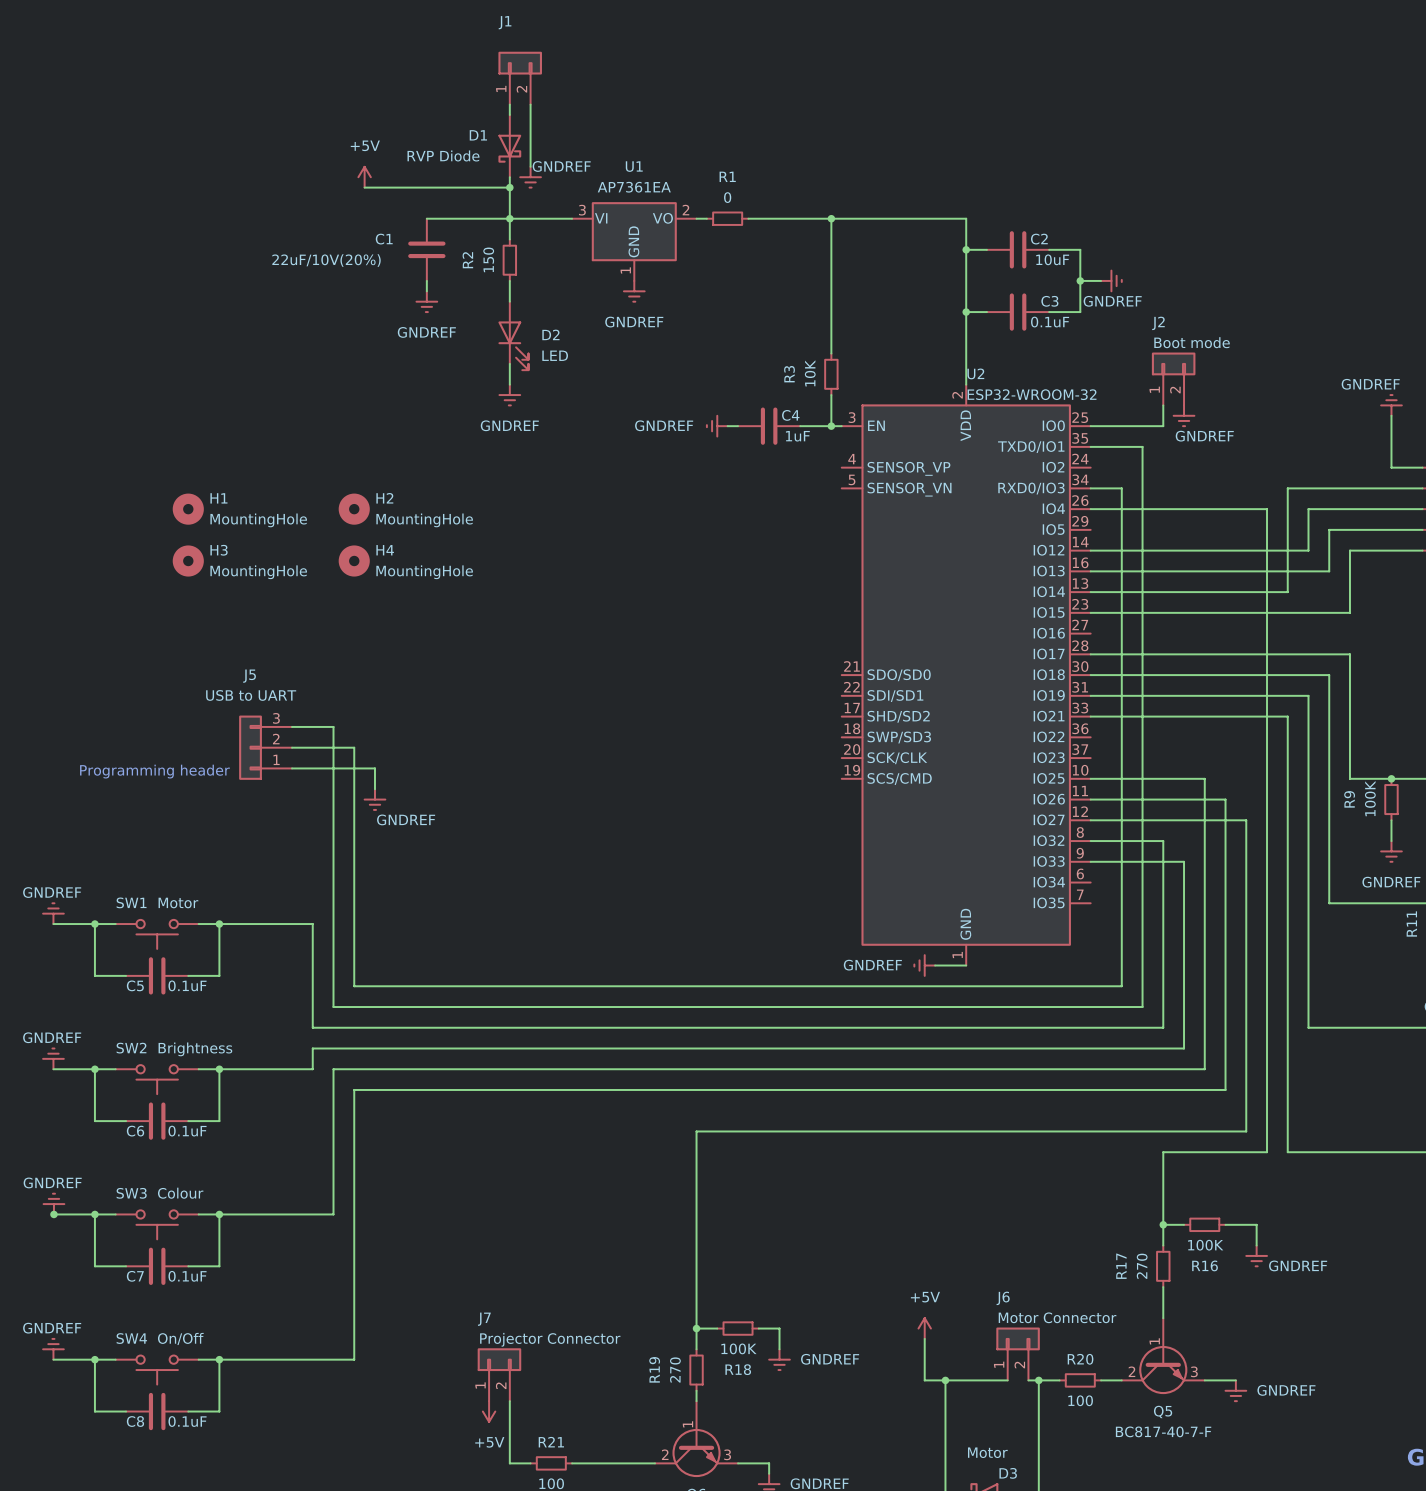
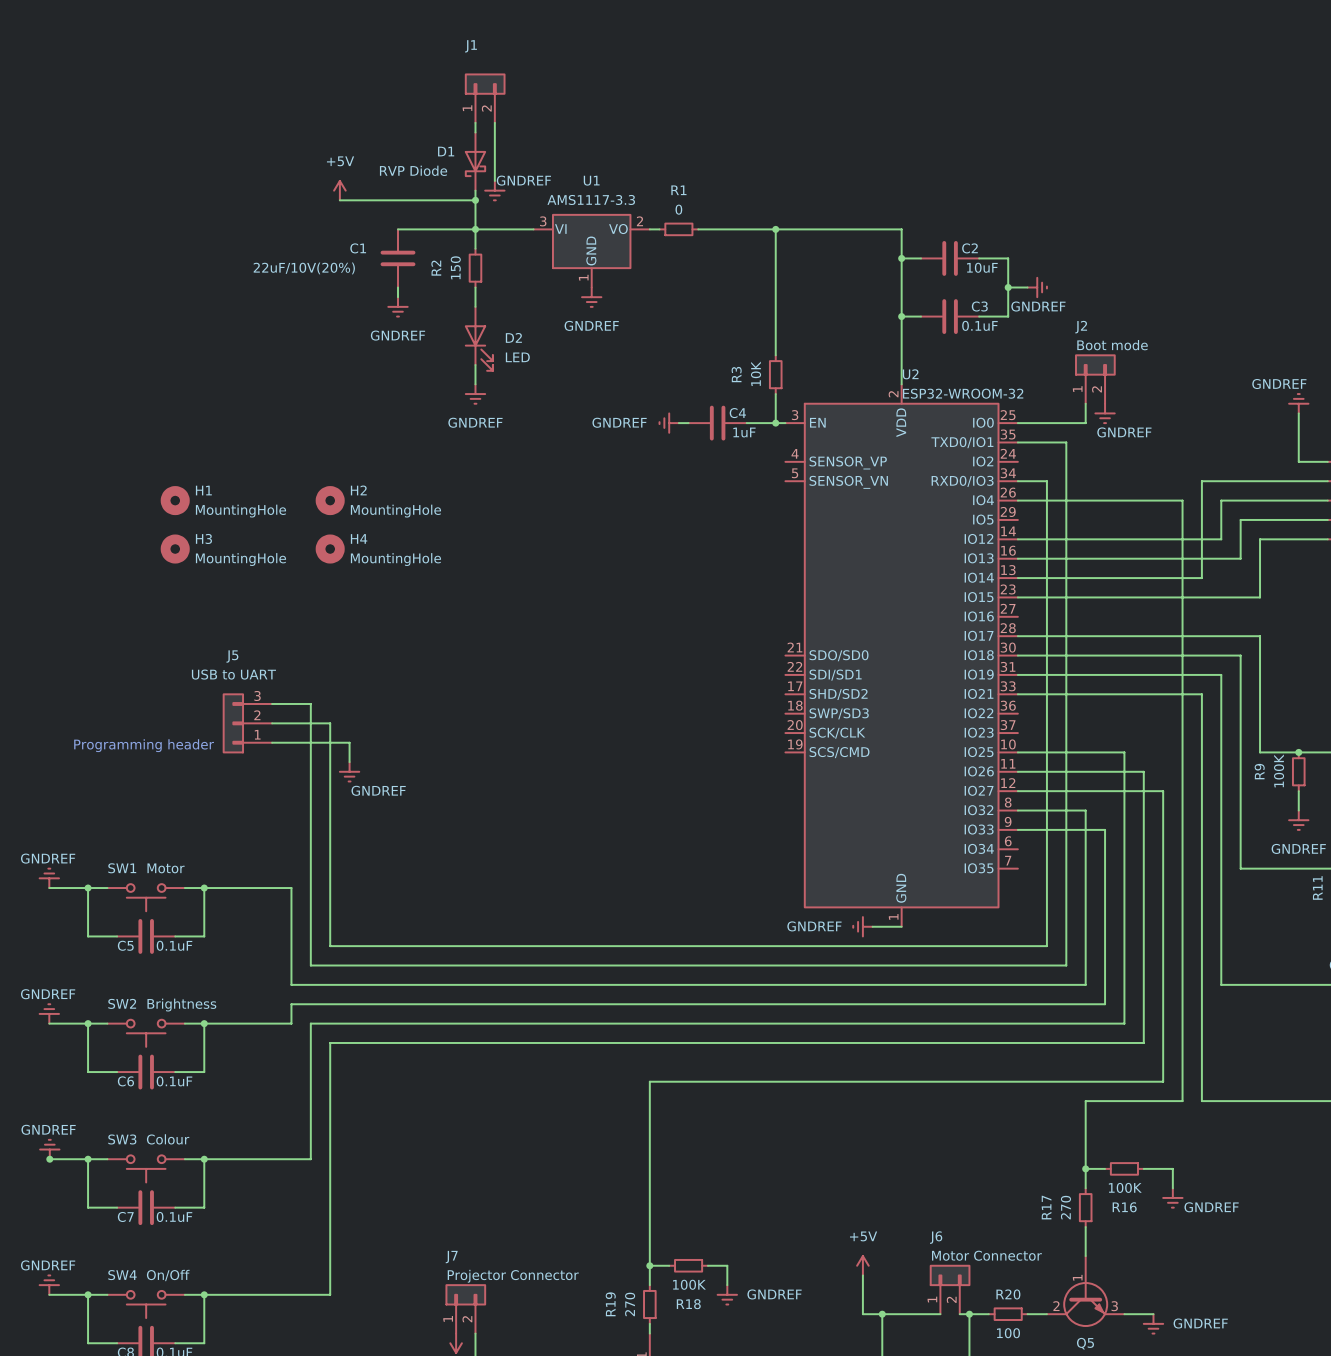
U1 value: AP7361EA (634, 187) -> AMS1117-3.3 (591, 199)

